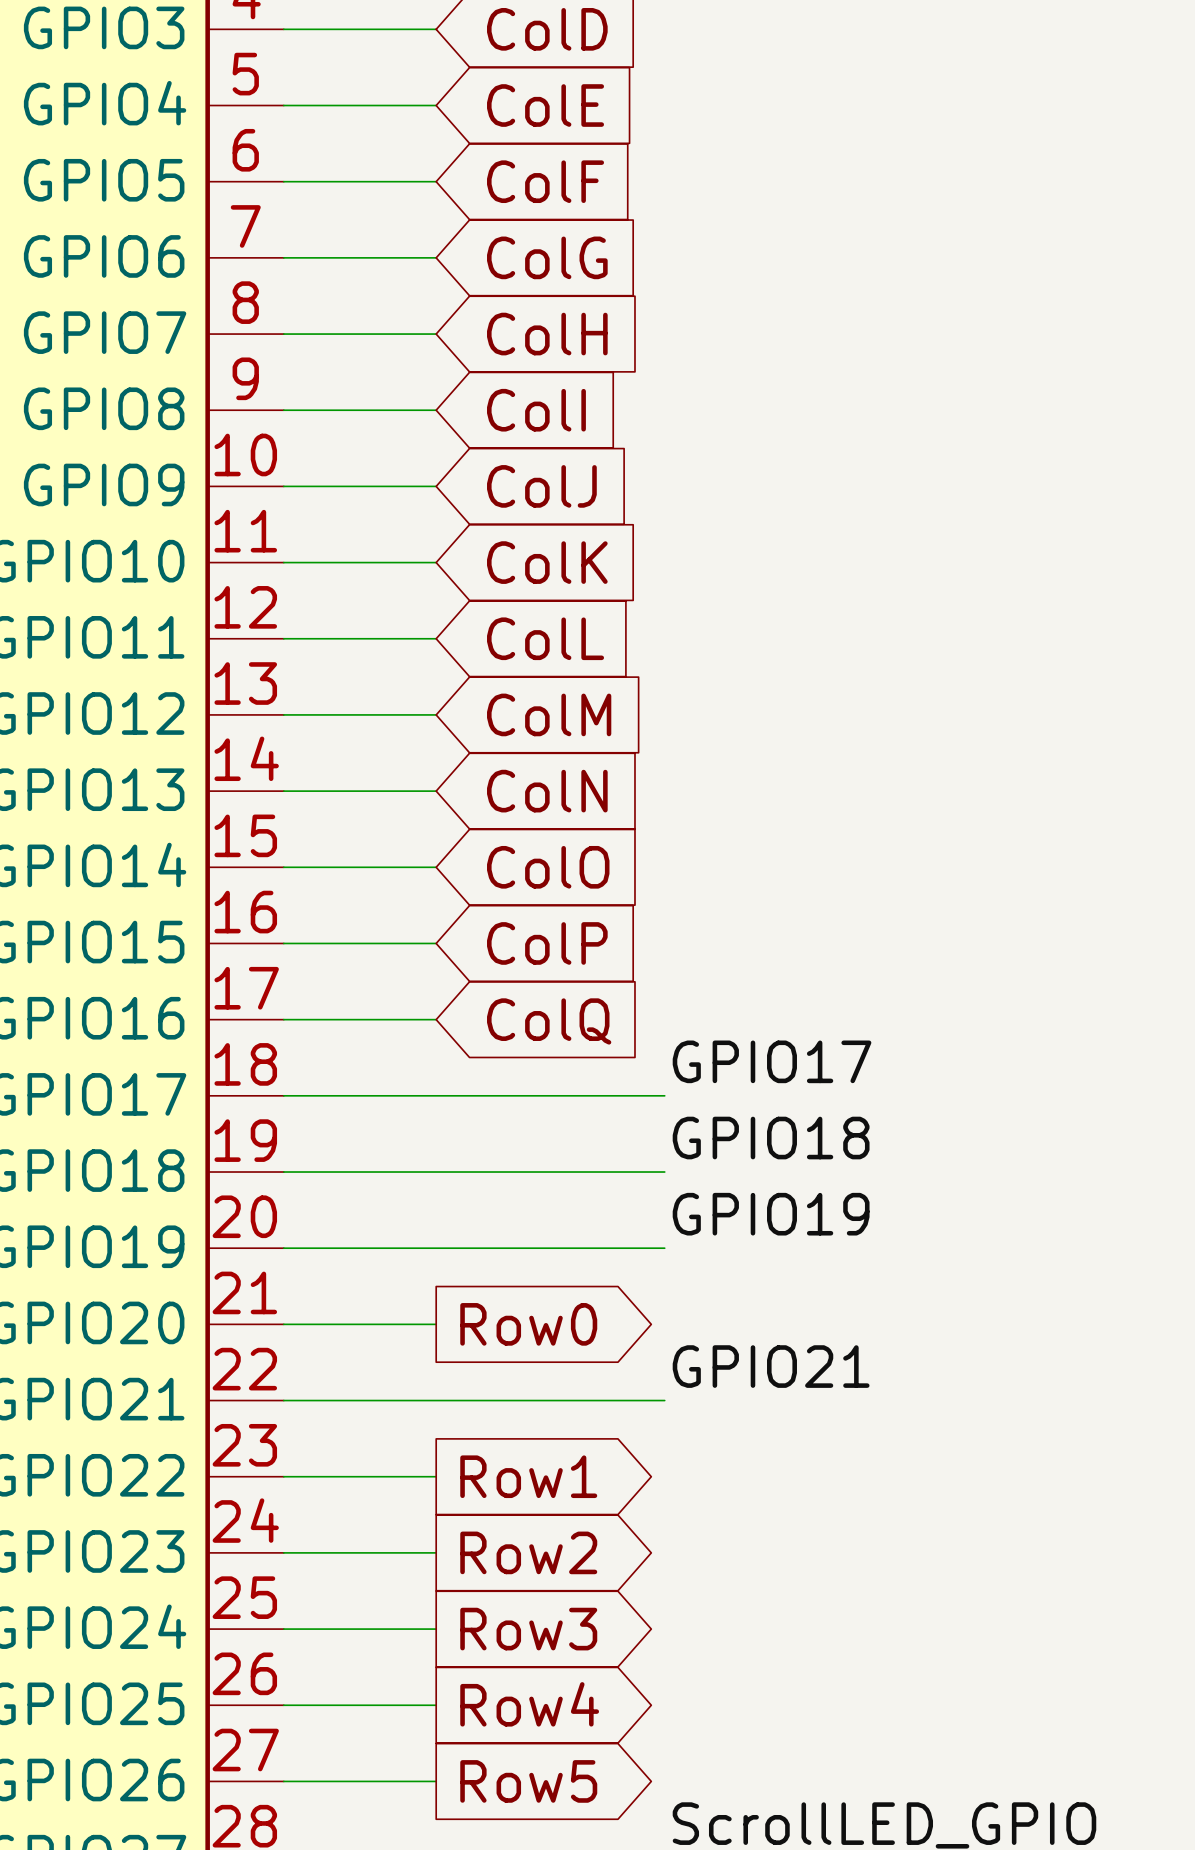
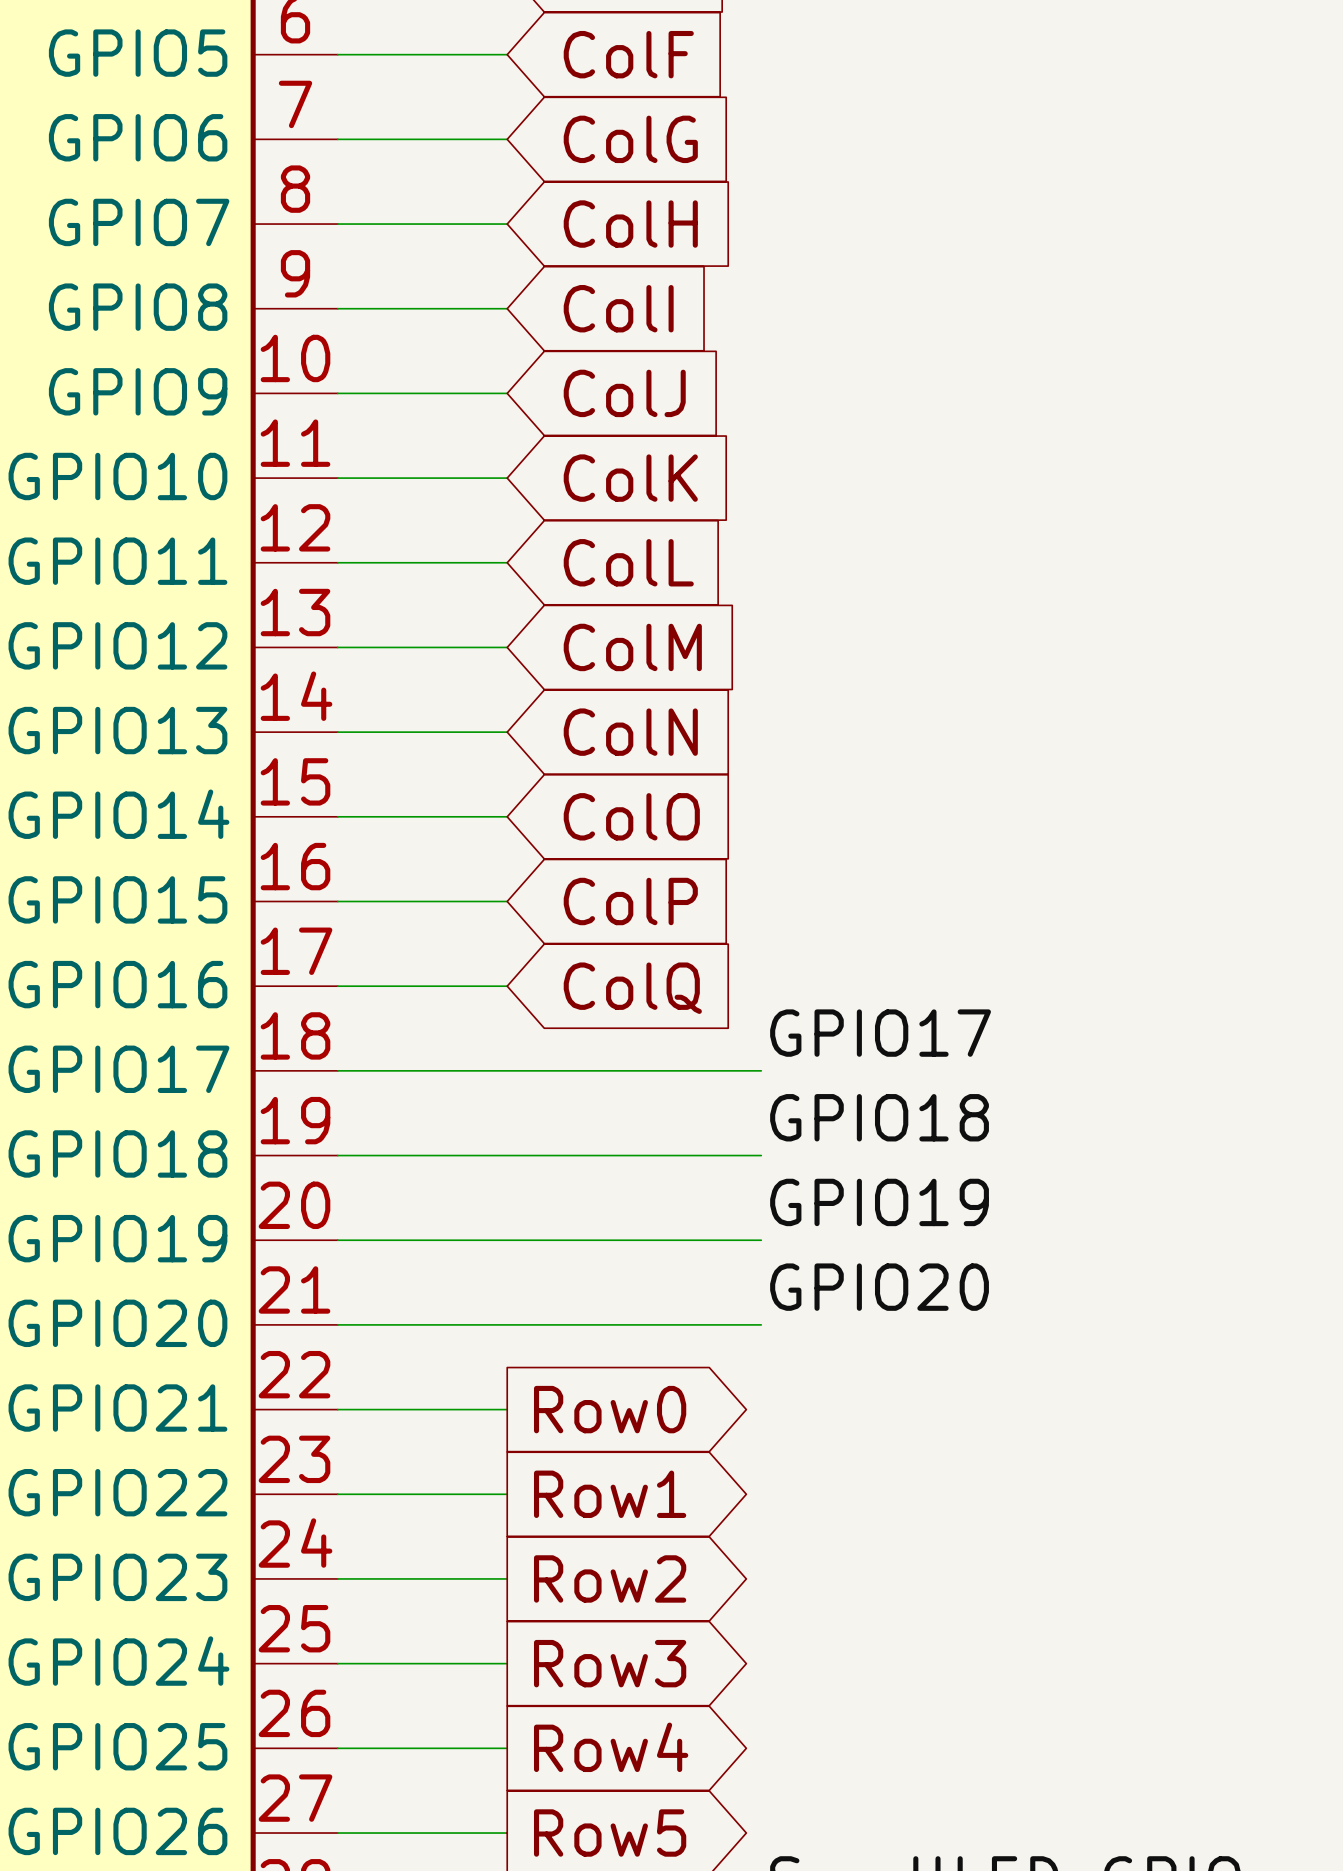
global label position: Row0 (528, 1324) -> Row0 (610, 1409)
label: GPIO21 (771, 1366) -> GPIO20 (879, 1287)
wire: (436, 1400) (664, 1400) -> (507, 1324) (761, 1324)

